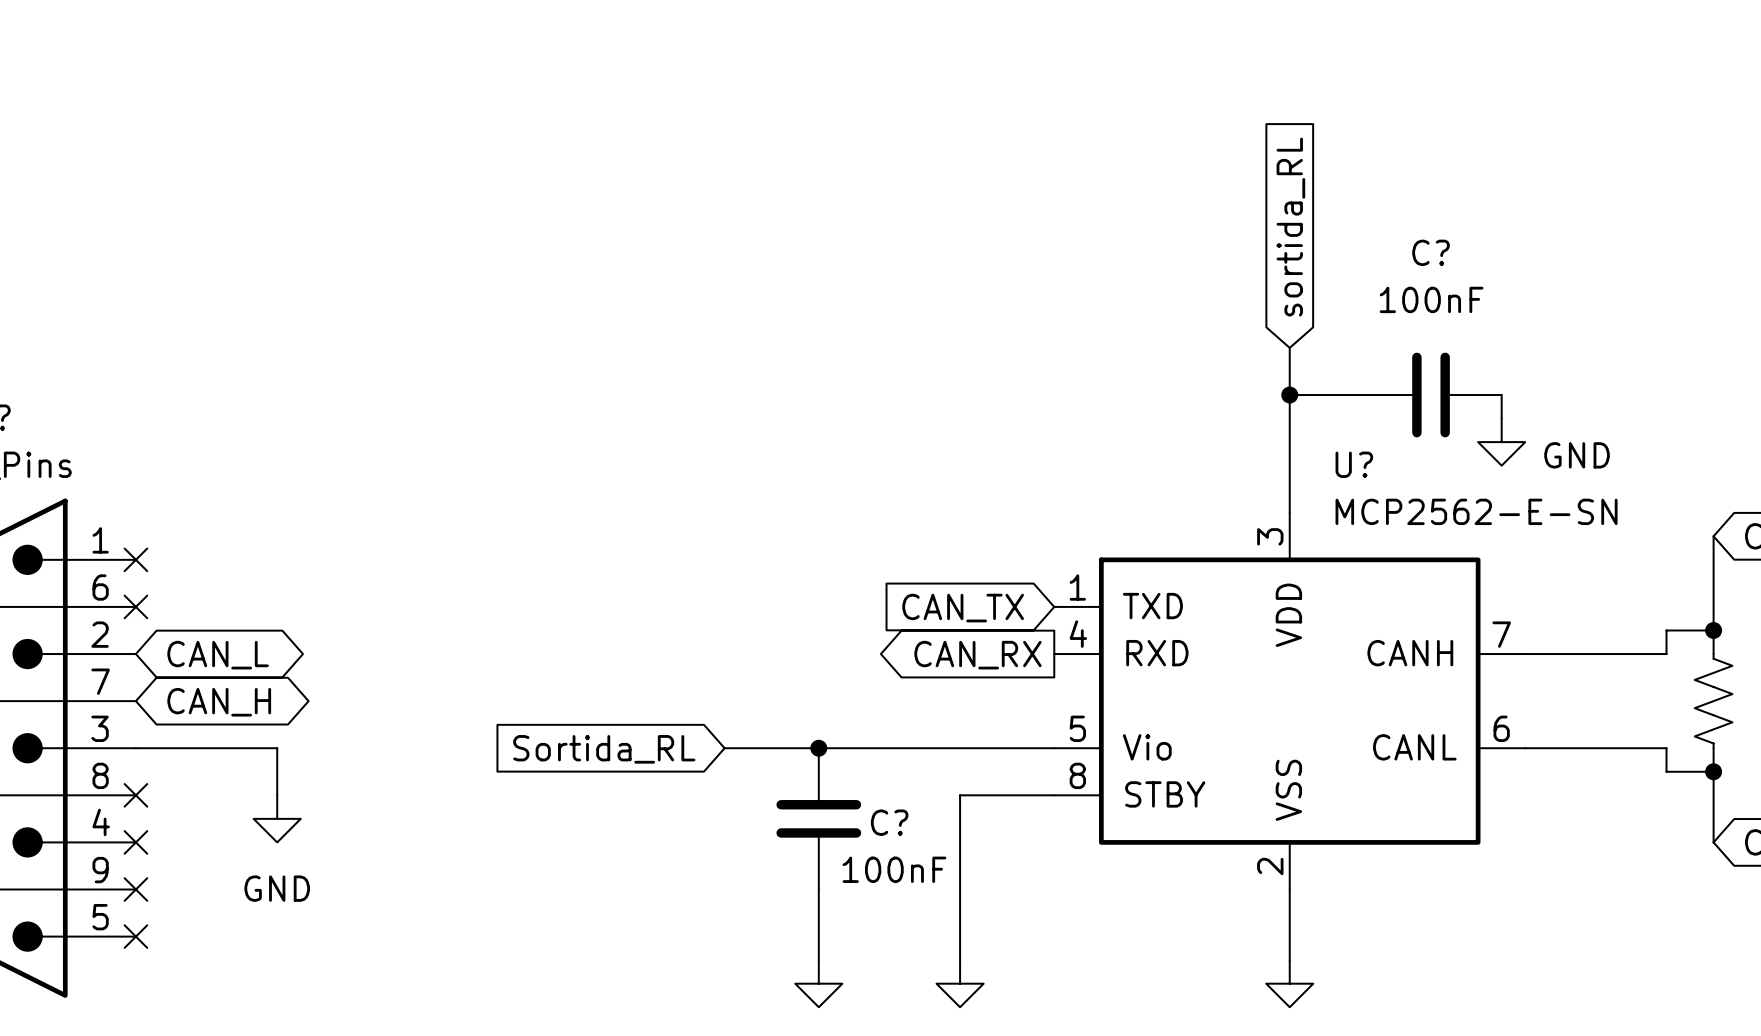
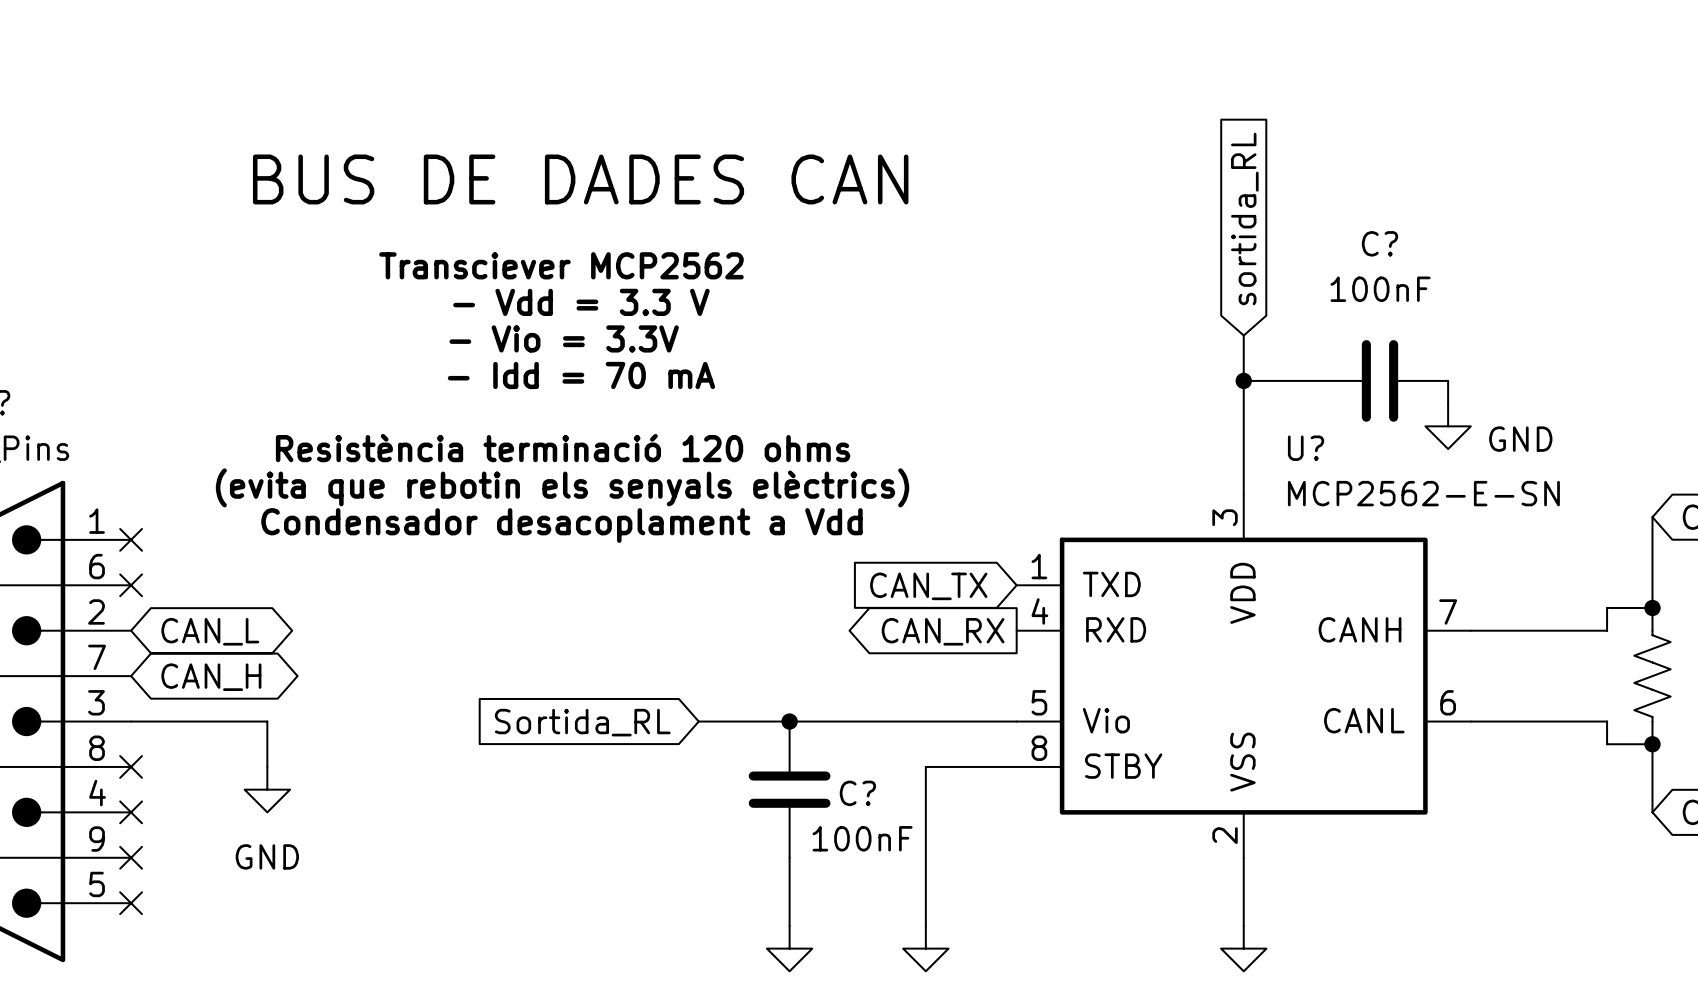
text: none -> BUS DE DADES CAN (580, 179)
text: none -> Transciever MCP2562 (561, 265)
text: none -> - Vdd = 3.3 V (581, 302)
text: none -> - Vio = 3.3V (564, 338)
text: none -> - Idd = 70 mA (581, 375)
text: none -> Resistència terminació 120 ohms (563, 448)
text: none -> (evita que rebotin els senyals elèctrics) (562, 487)
text: none -> Condensador desacoplament a Vdd (561, 525)

